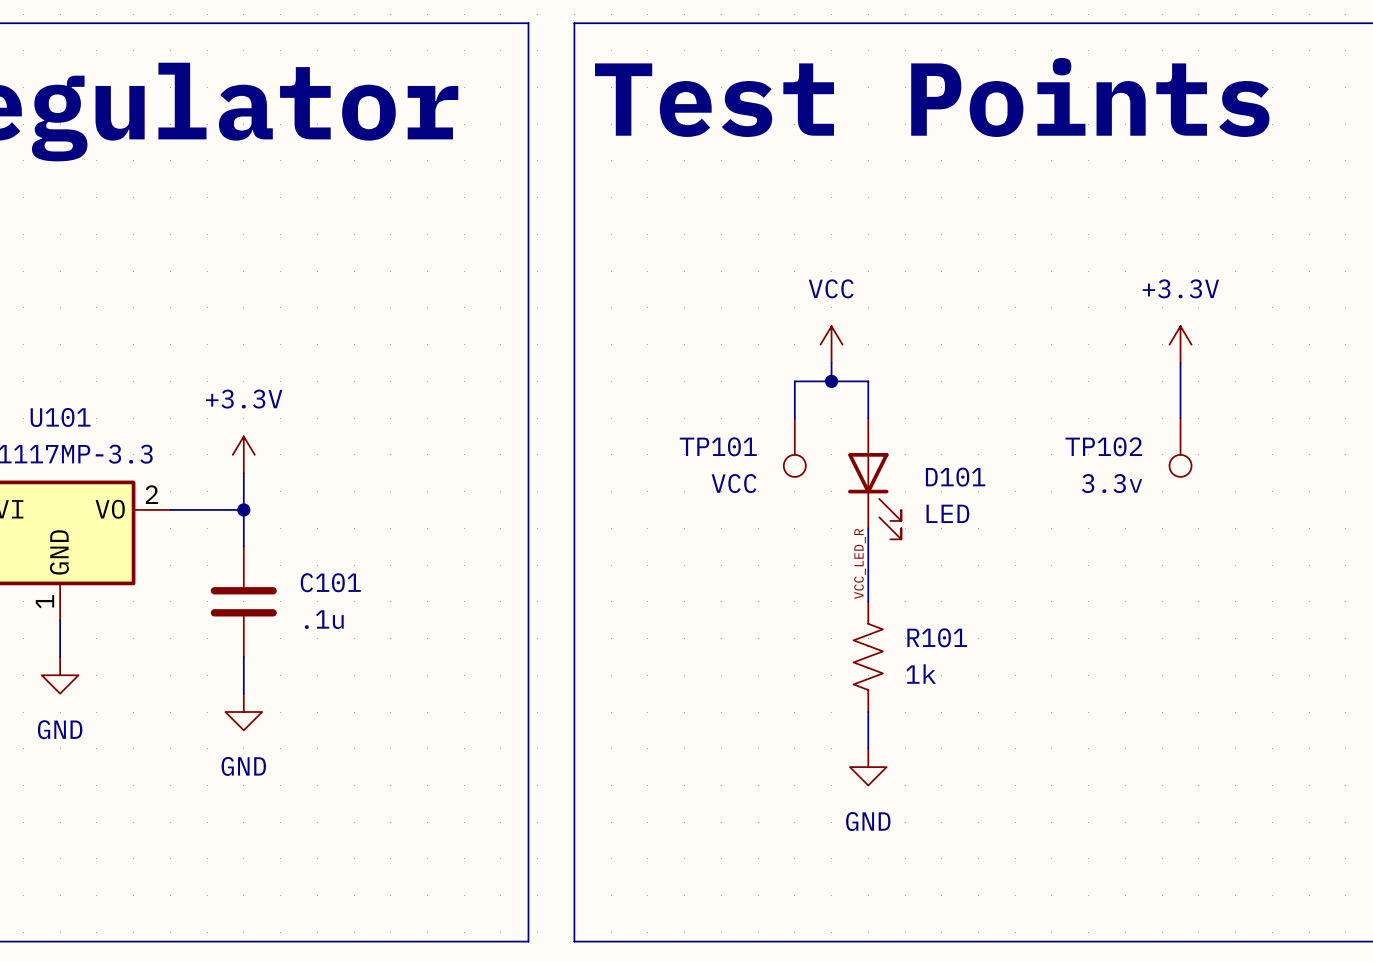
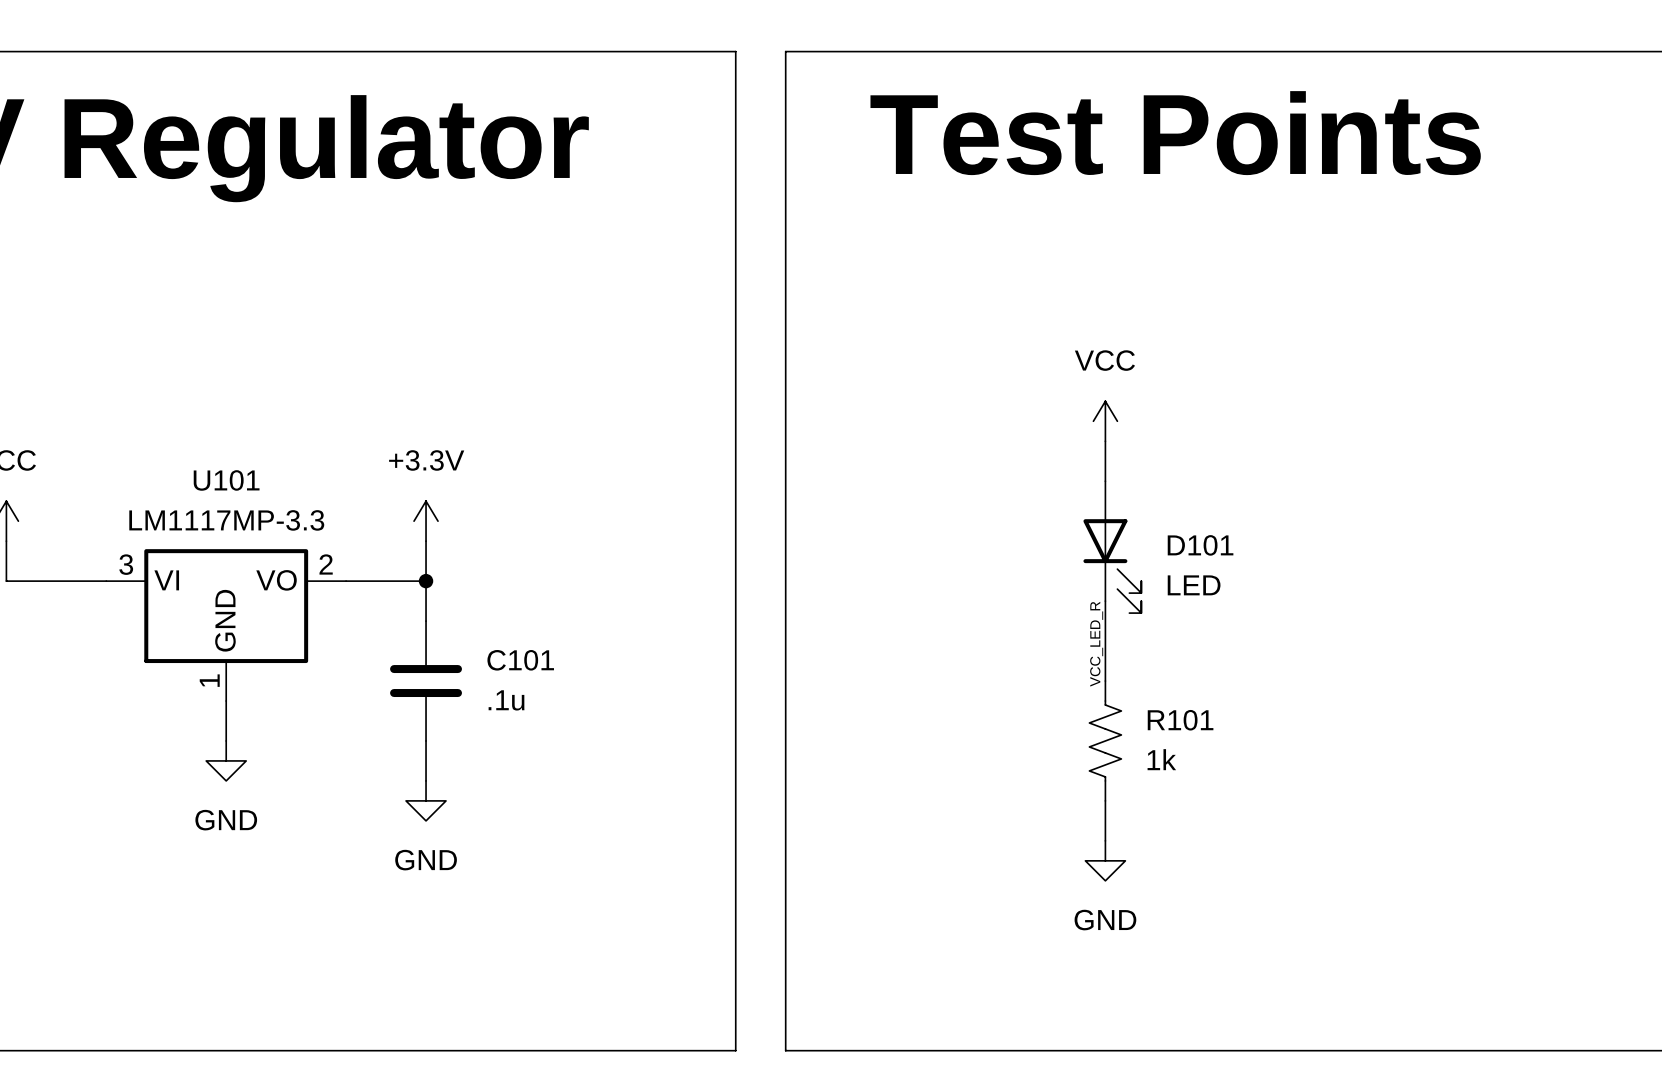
power symbol position: VCC (831, 344) -> VCC (1105, 421)
power symbol: +3.3V (1180, 344) -> none
wire: (831, 363) (831, 381) -> none
wire: (1180, 363) (1180, 418) -> none
junction: (831, 381) -> none
wire: (868, 381) (794, 381) (794, 418) -> none
TP101: VCC (794, 447) -> none
TP102: 3.3v (1180, 447) -> none

